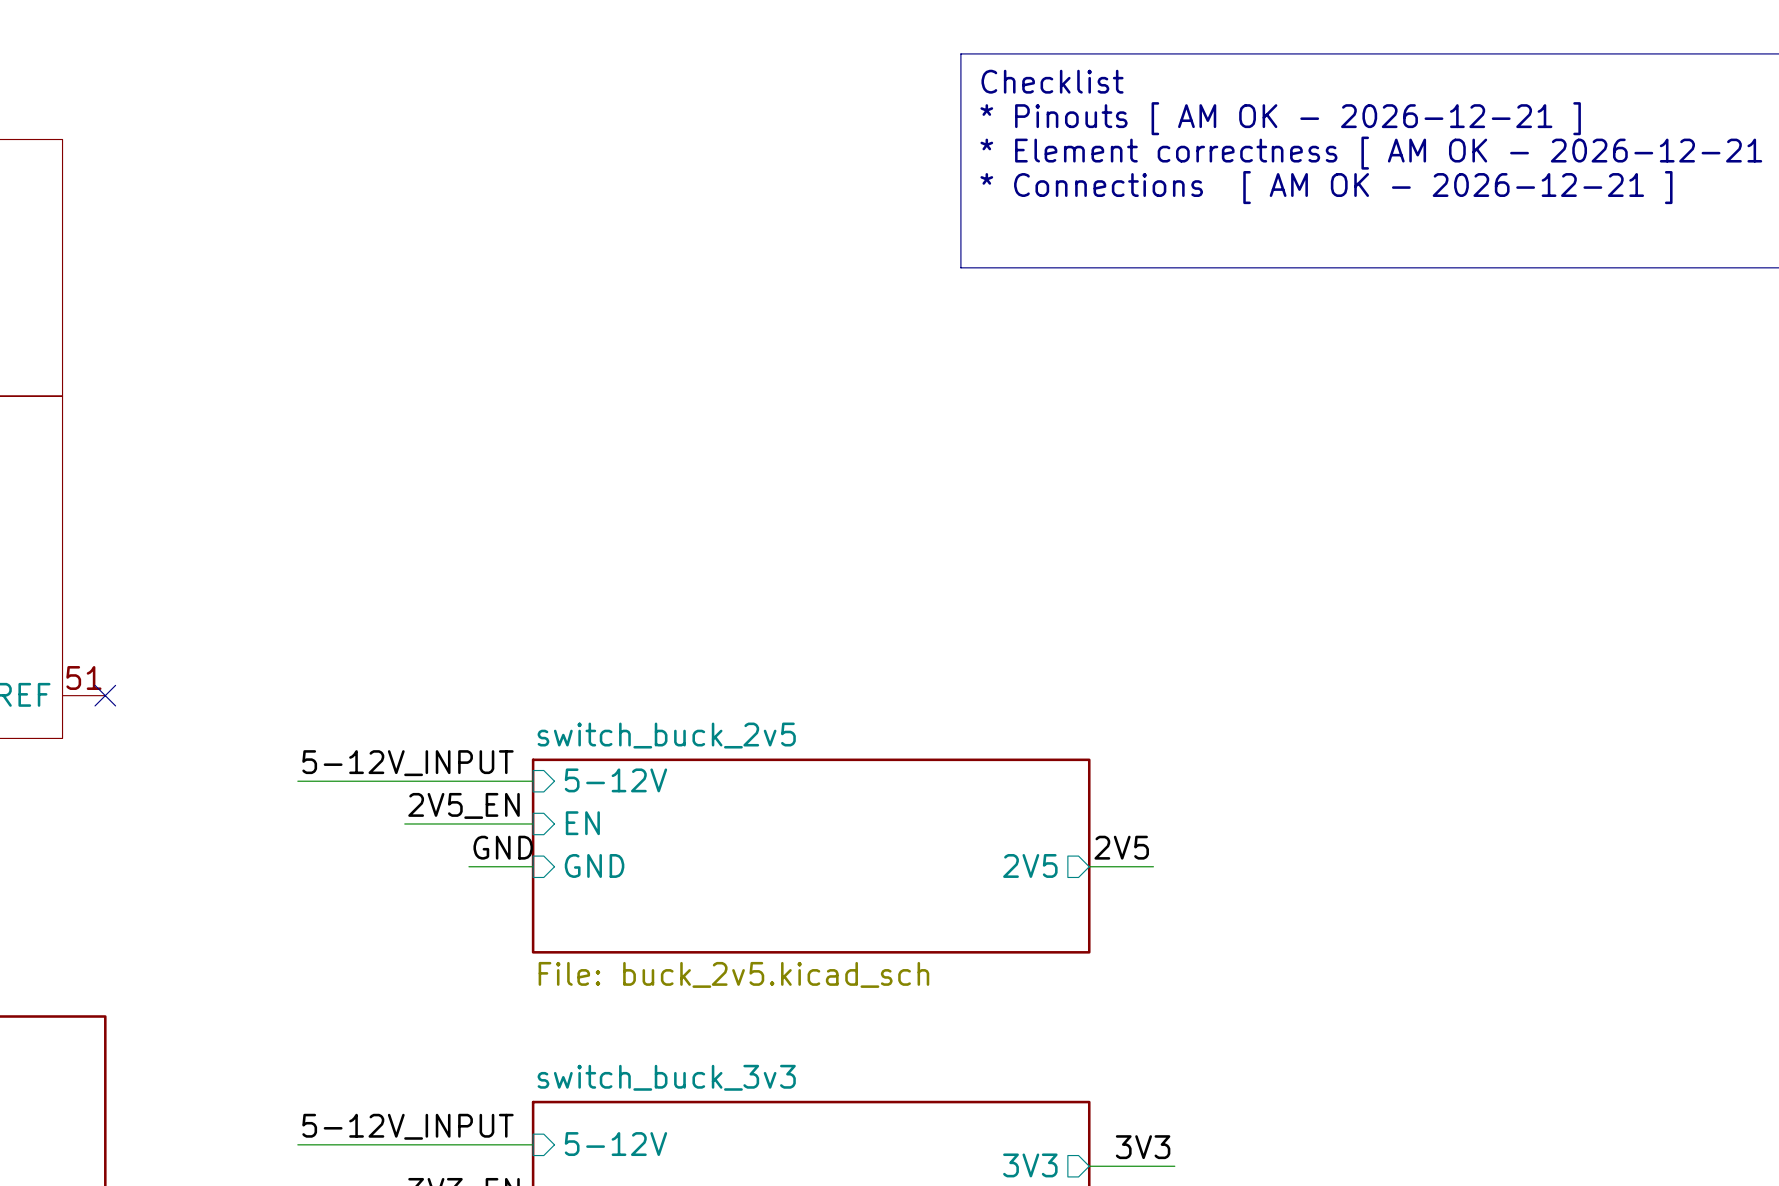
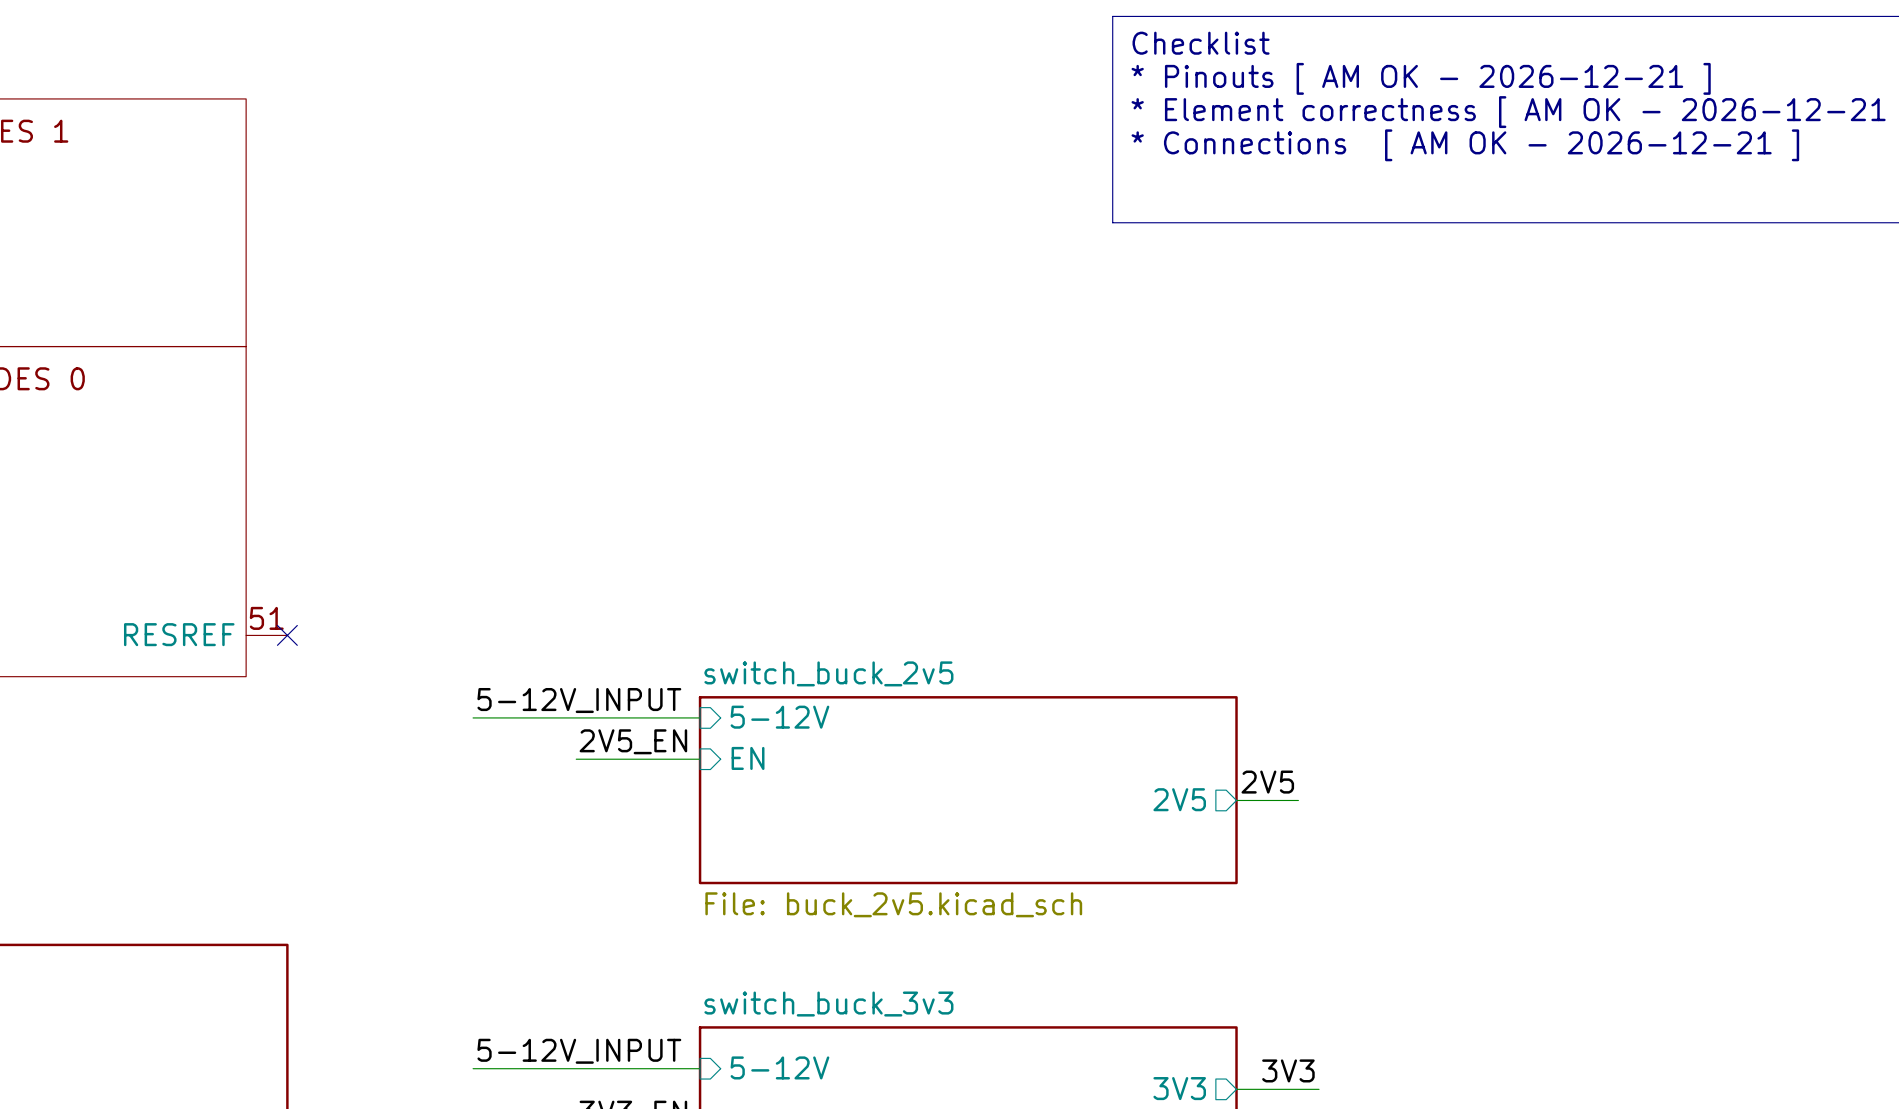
label: GND (503, 847) -> none
sheet pin: GND (594, 865) -> none
wire: (468, 866) (533, 866) -> none

